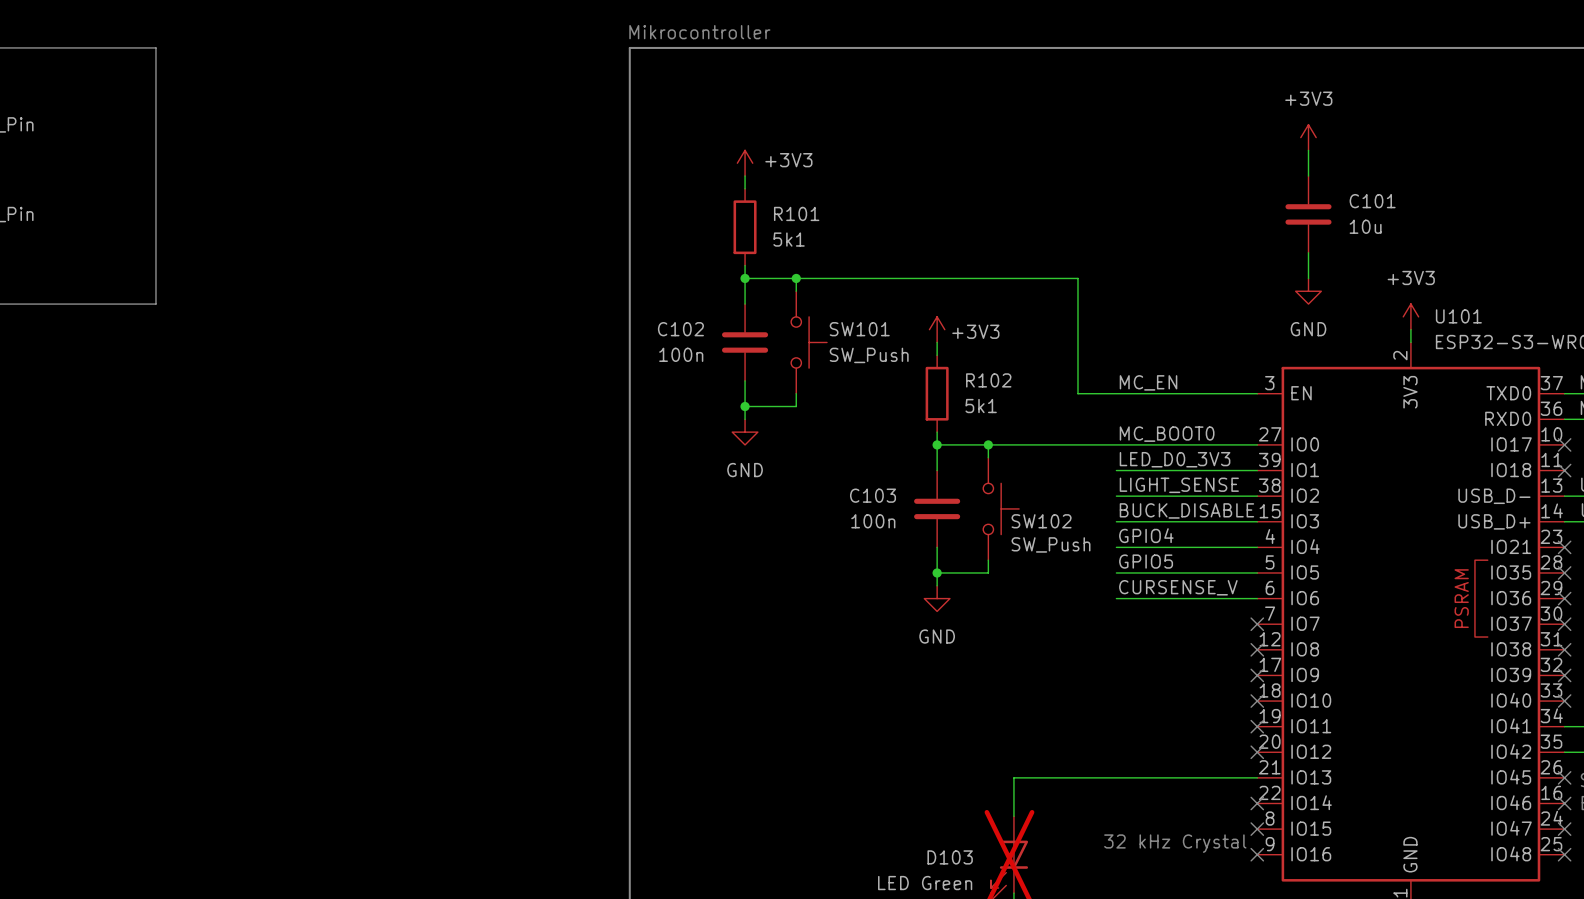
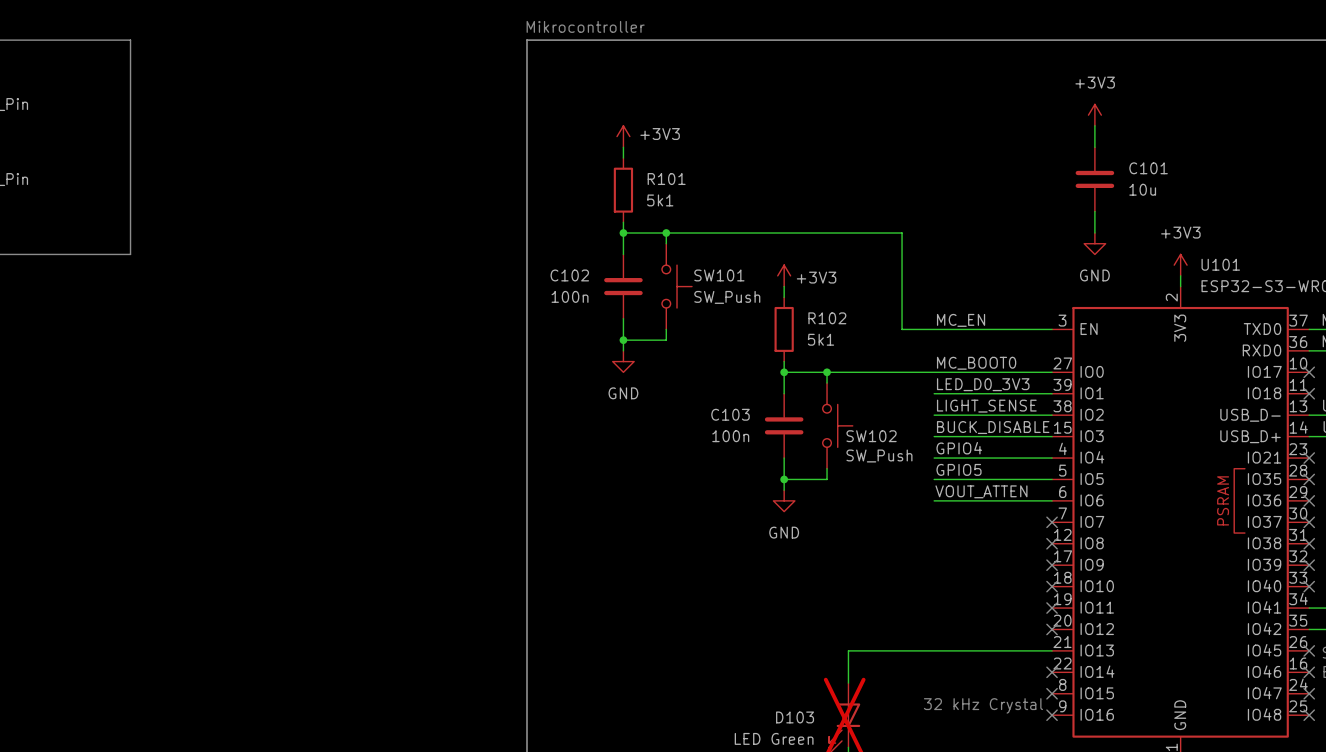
label: CURSENSE_V (1178, 587) -> VOUT_ATTEN (981, 491)

